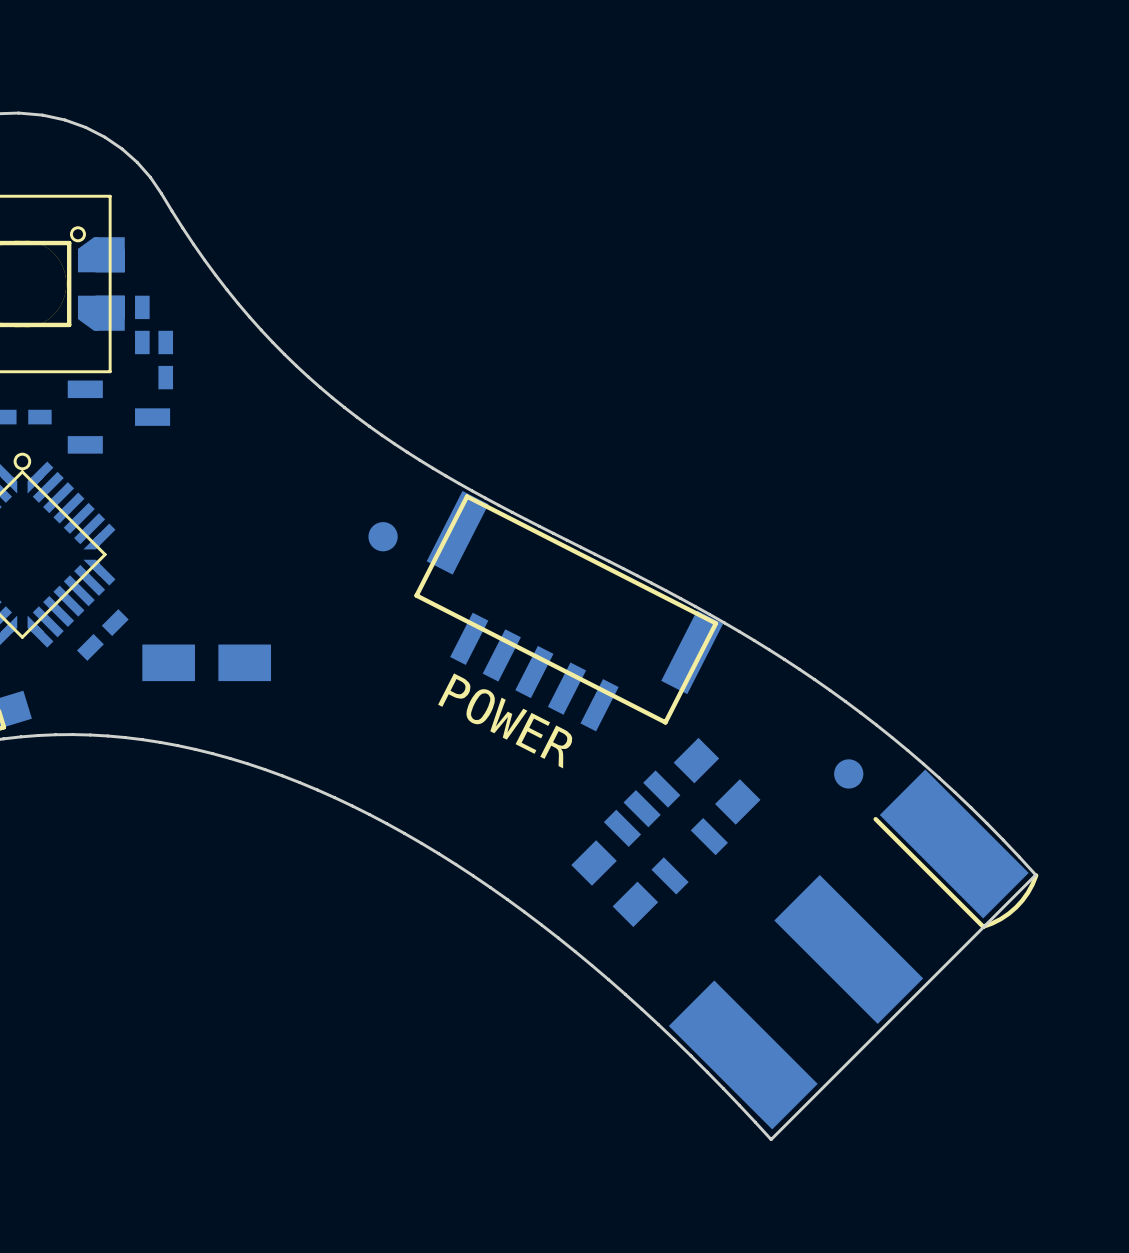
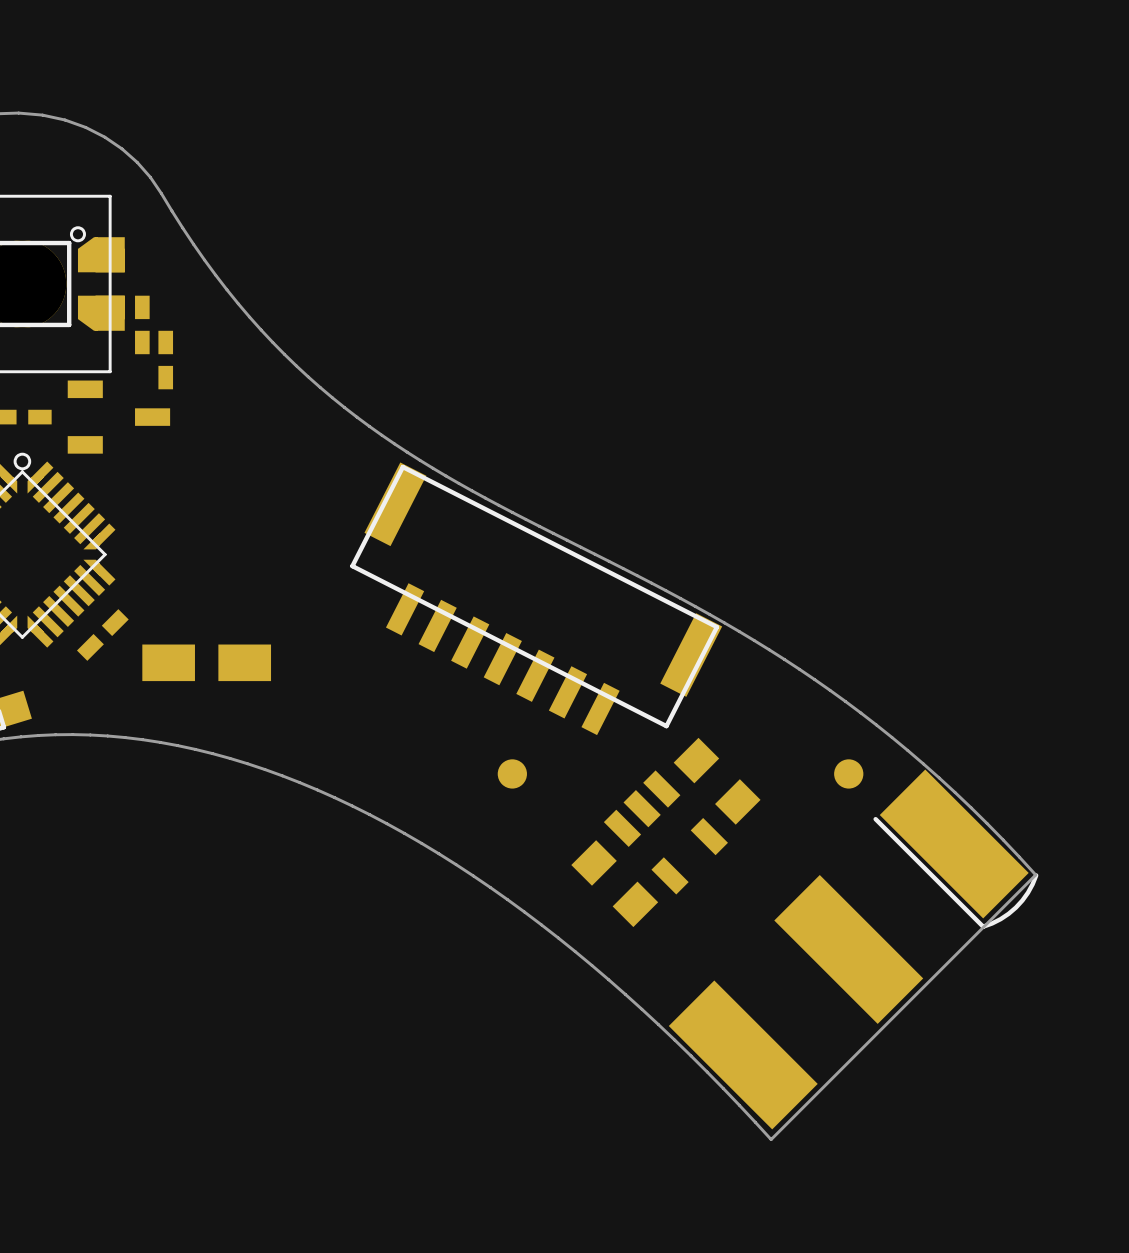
part position: (383, 536) -> (512, 773)
part: none -> (536, 598)
part: (568, 611) -> none
text: POWER (505, 720) -> none

